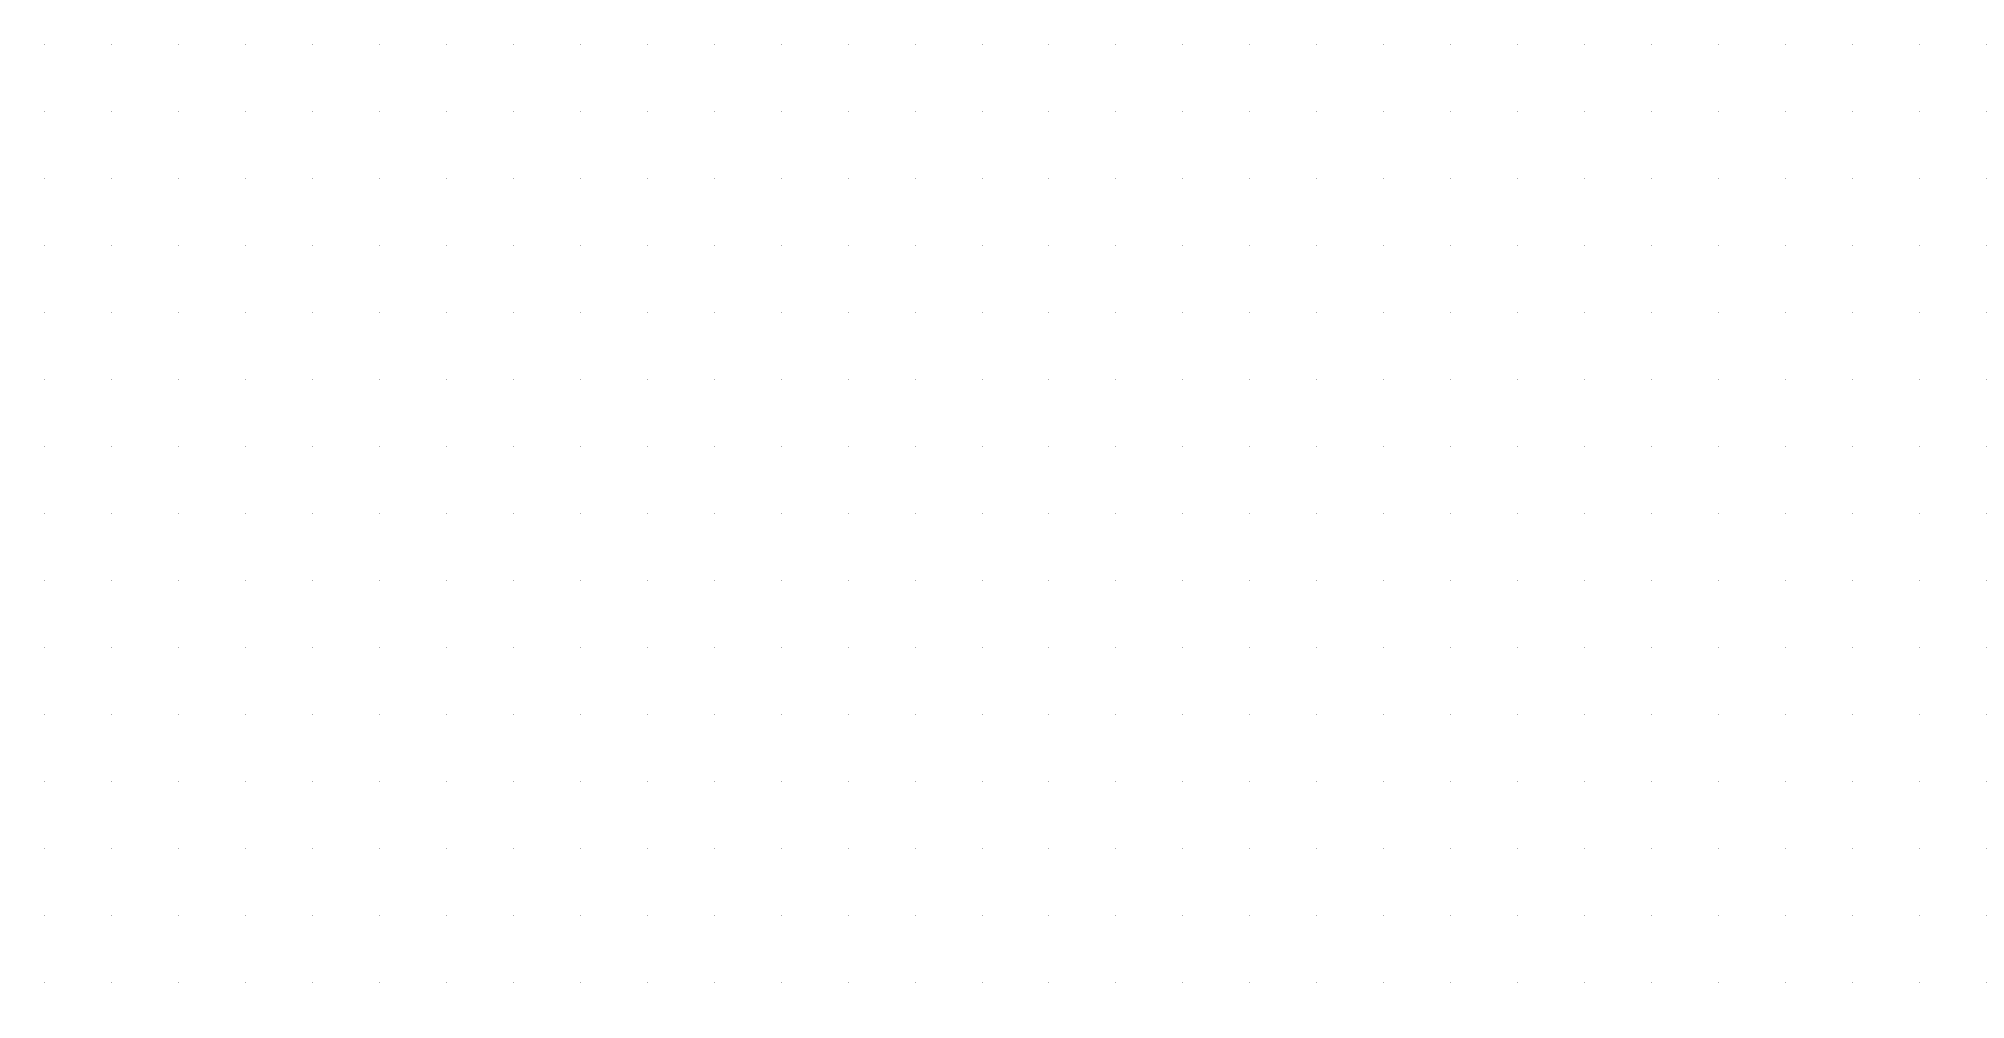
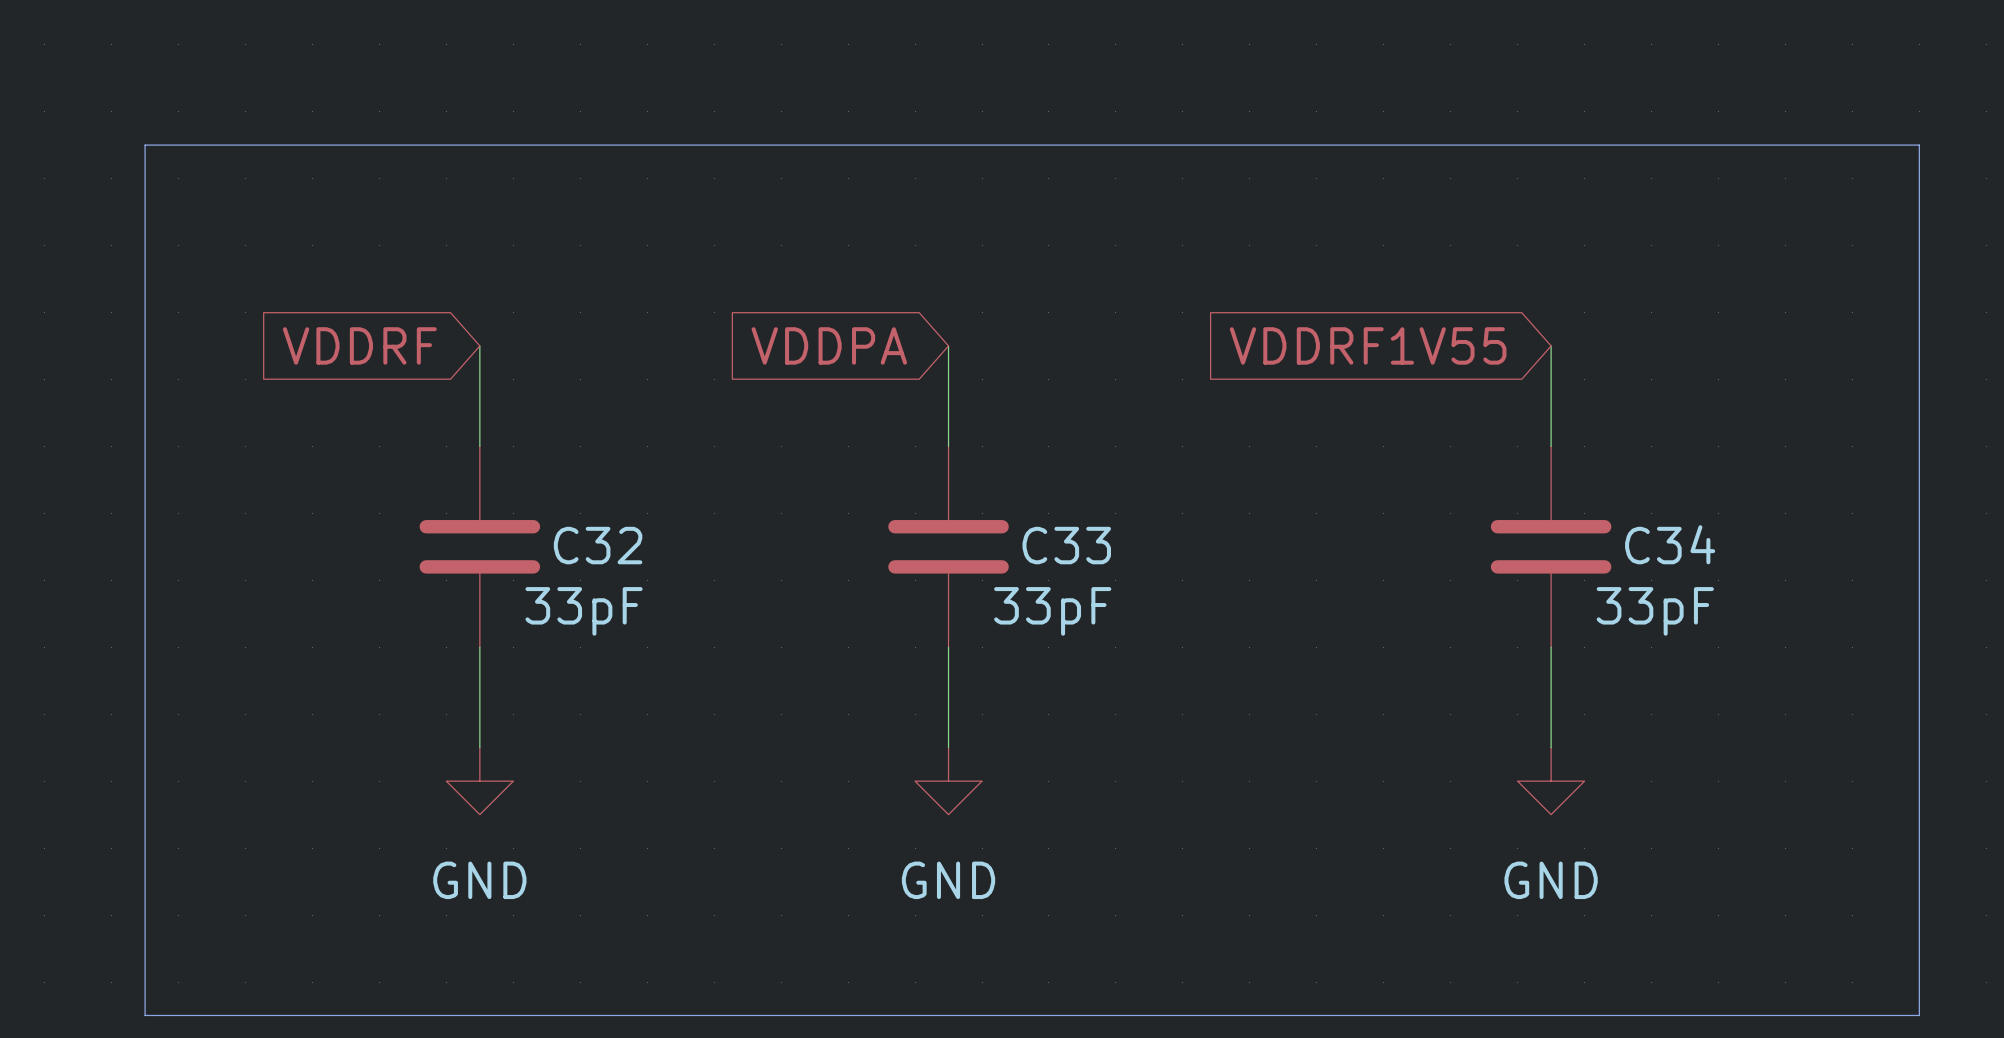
line: none -> (145, 145) (1919, 145) (1919, 1015) (145, 1015) (145, 145)
global label: none -> VDDRF (359, 345)
wire: none -> (479, 345) (479, 446)
global label: none -> VDDPA (829, 345)
wire: none -> (948, 345) (948, 446)
global label: none -> VDDRF1V55 (1368, 345)
wire: none -> (1551, 345) (1551, 446)
C32: none -> 33pF (479, 546)
C33: none -> 33pF (948, 546)
C34: none -> 33pF (1551, 546)
wire: none -> (479, 647) (479, 747)
wire: none -> (948, 647) (948, 747)
wire: none -> (1551, 647) (1551, 747)
power symbol: none -> GND (479, 781)
power symbol: none -> GND (948, 781)
power symbol: none -> GND (1551, 781)

